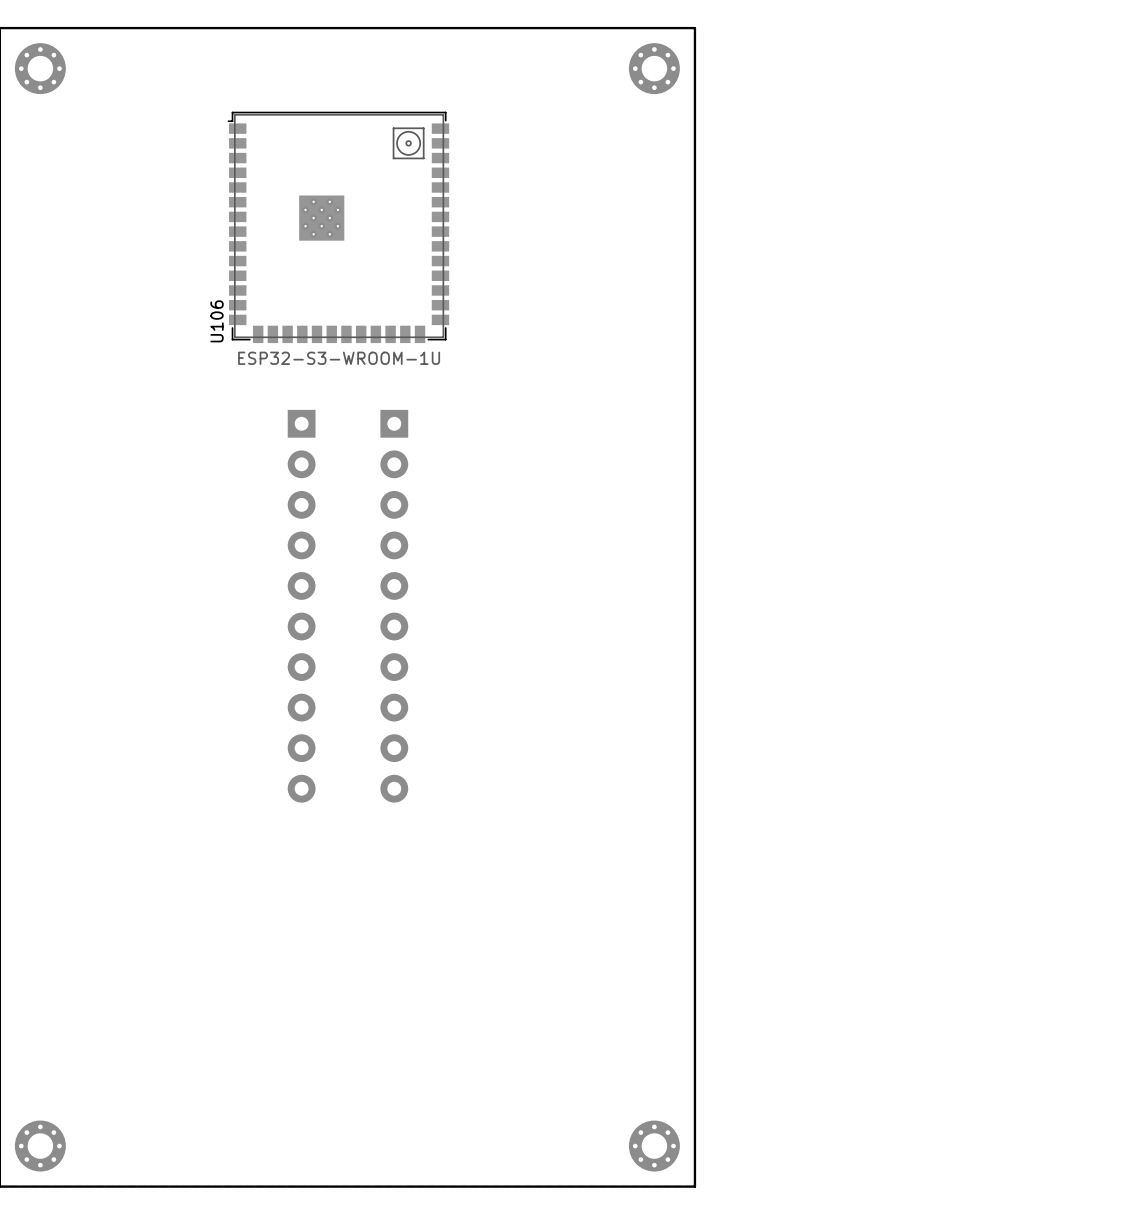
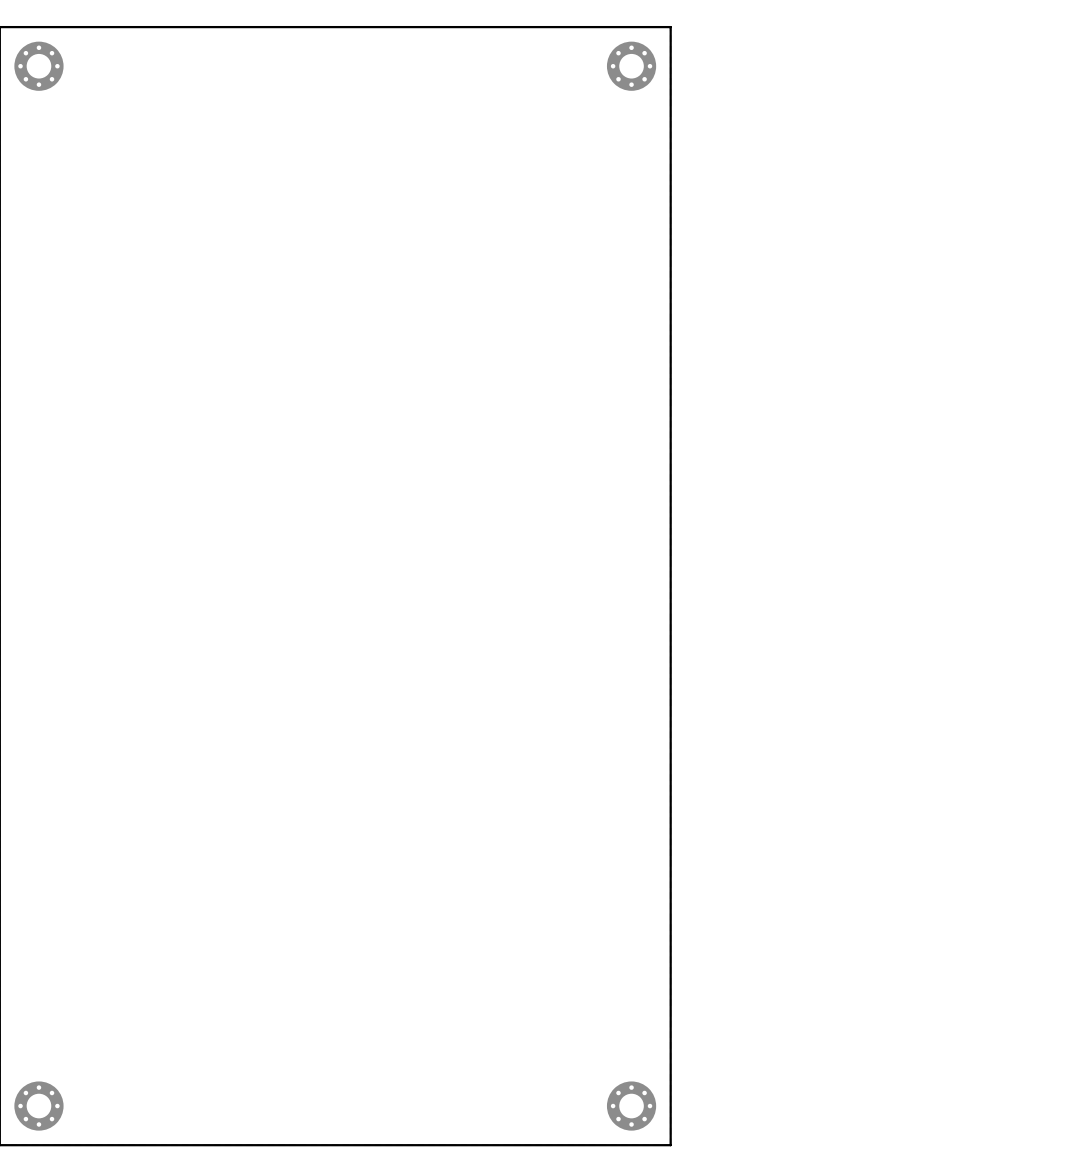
U106: ESP32-S3-WROOM-1U (338, 227) -> none
part: (301, 606) -> none
part: (394, 606) -> none

